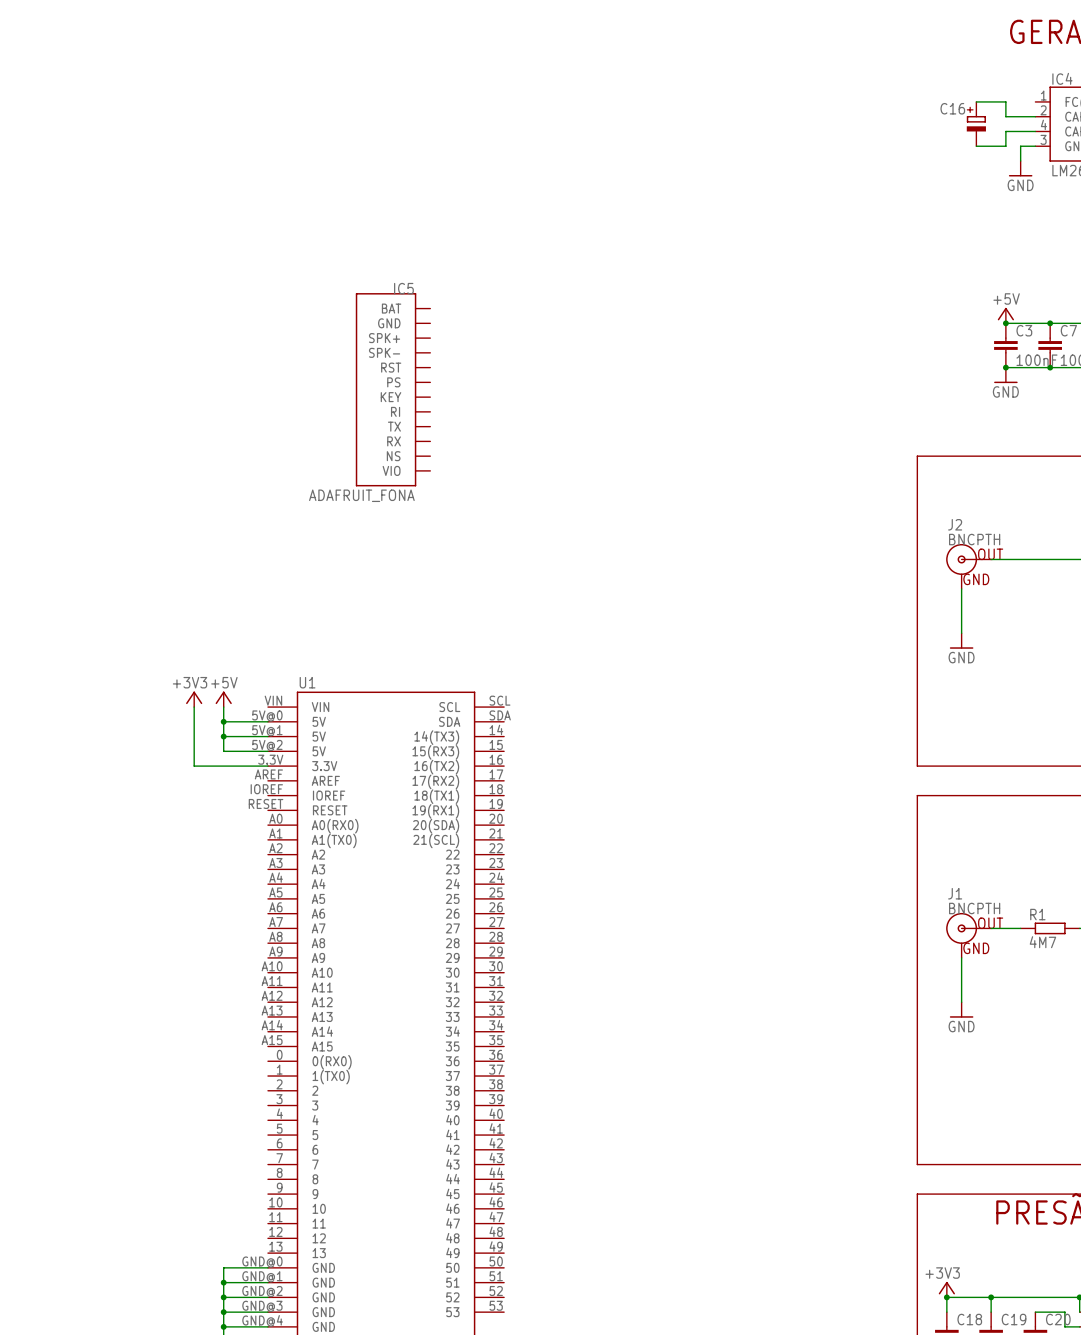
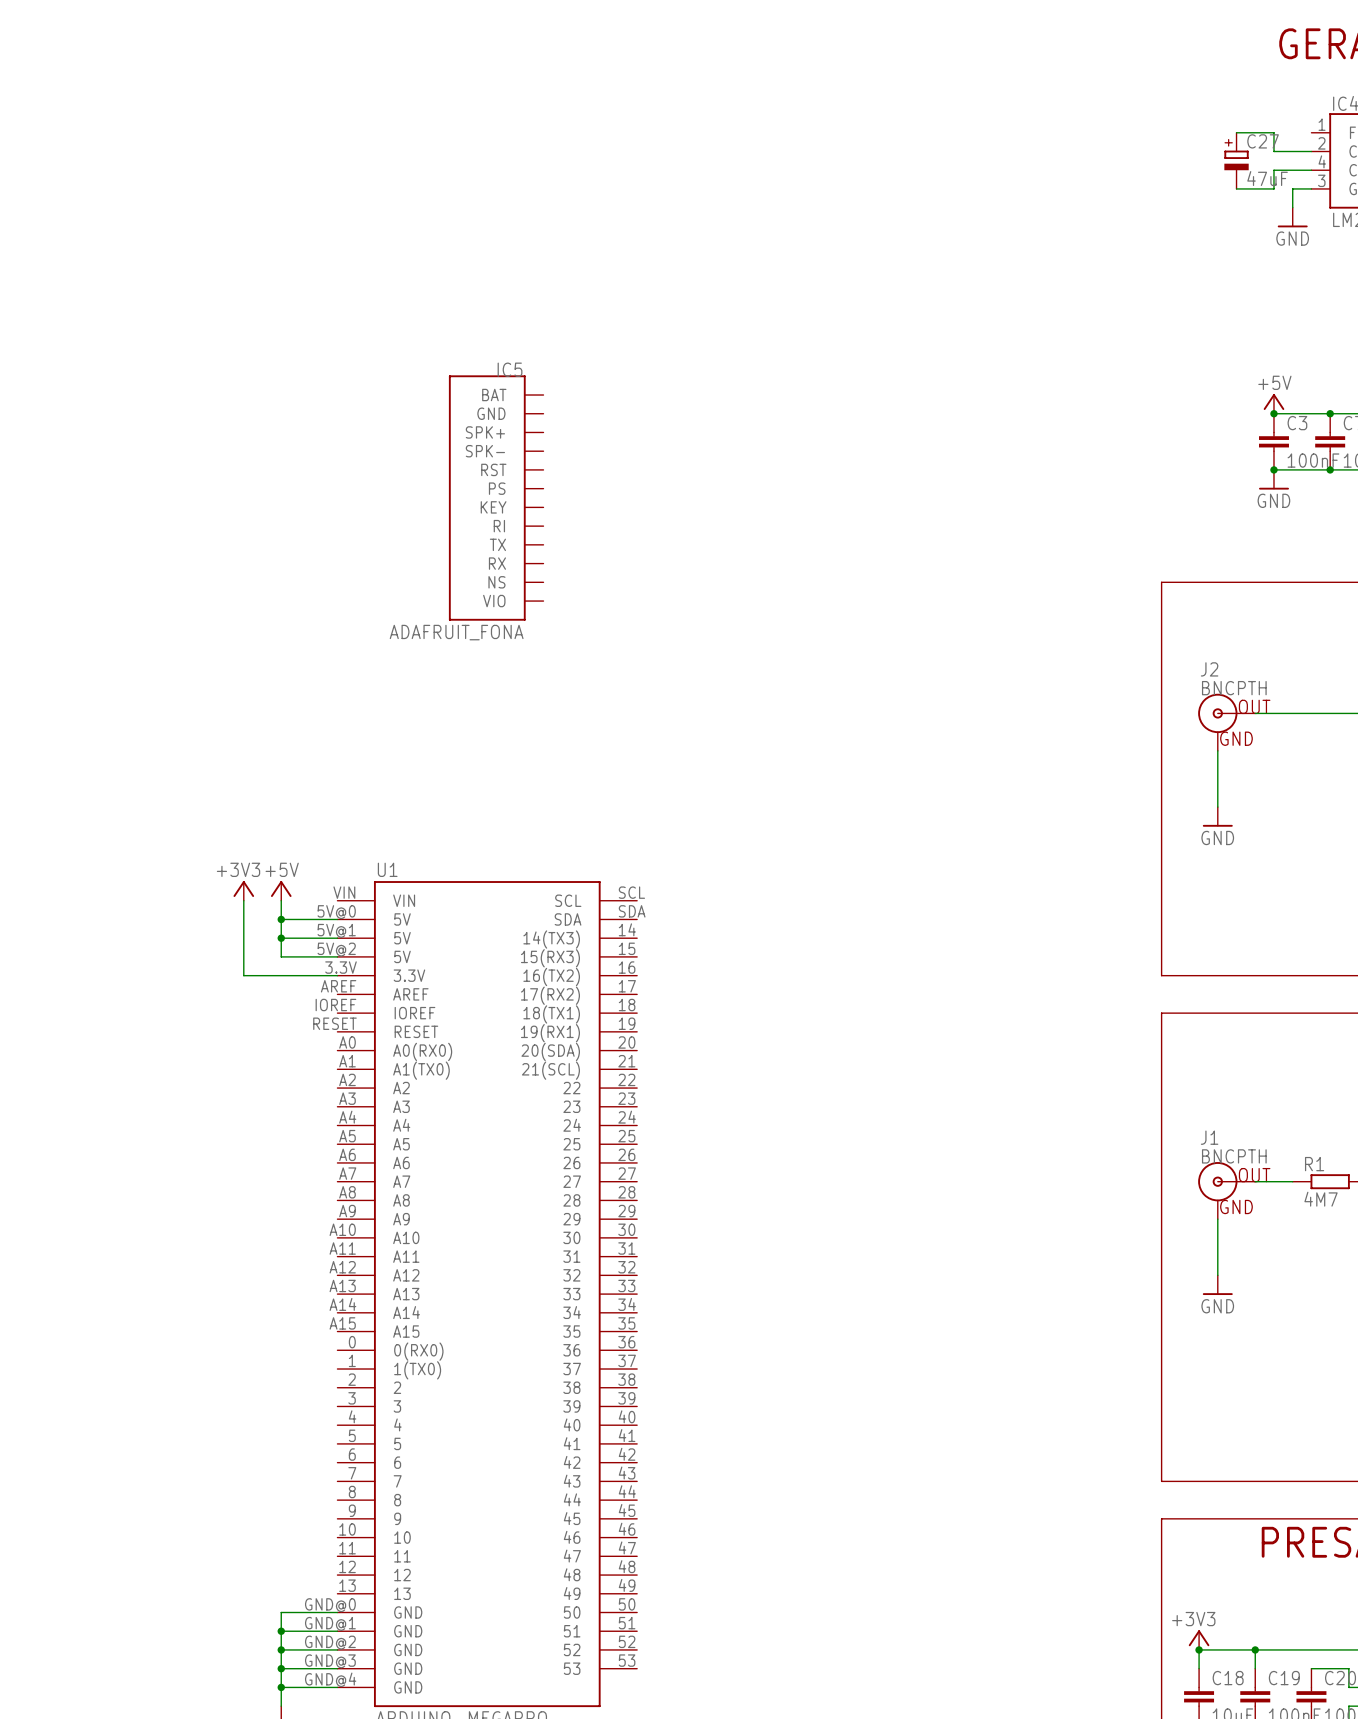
C16 name: C16 (952, 108) -> C27 (1263, 141)
C16 value: none -> 47uF (1267, 178)

